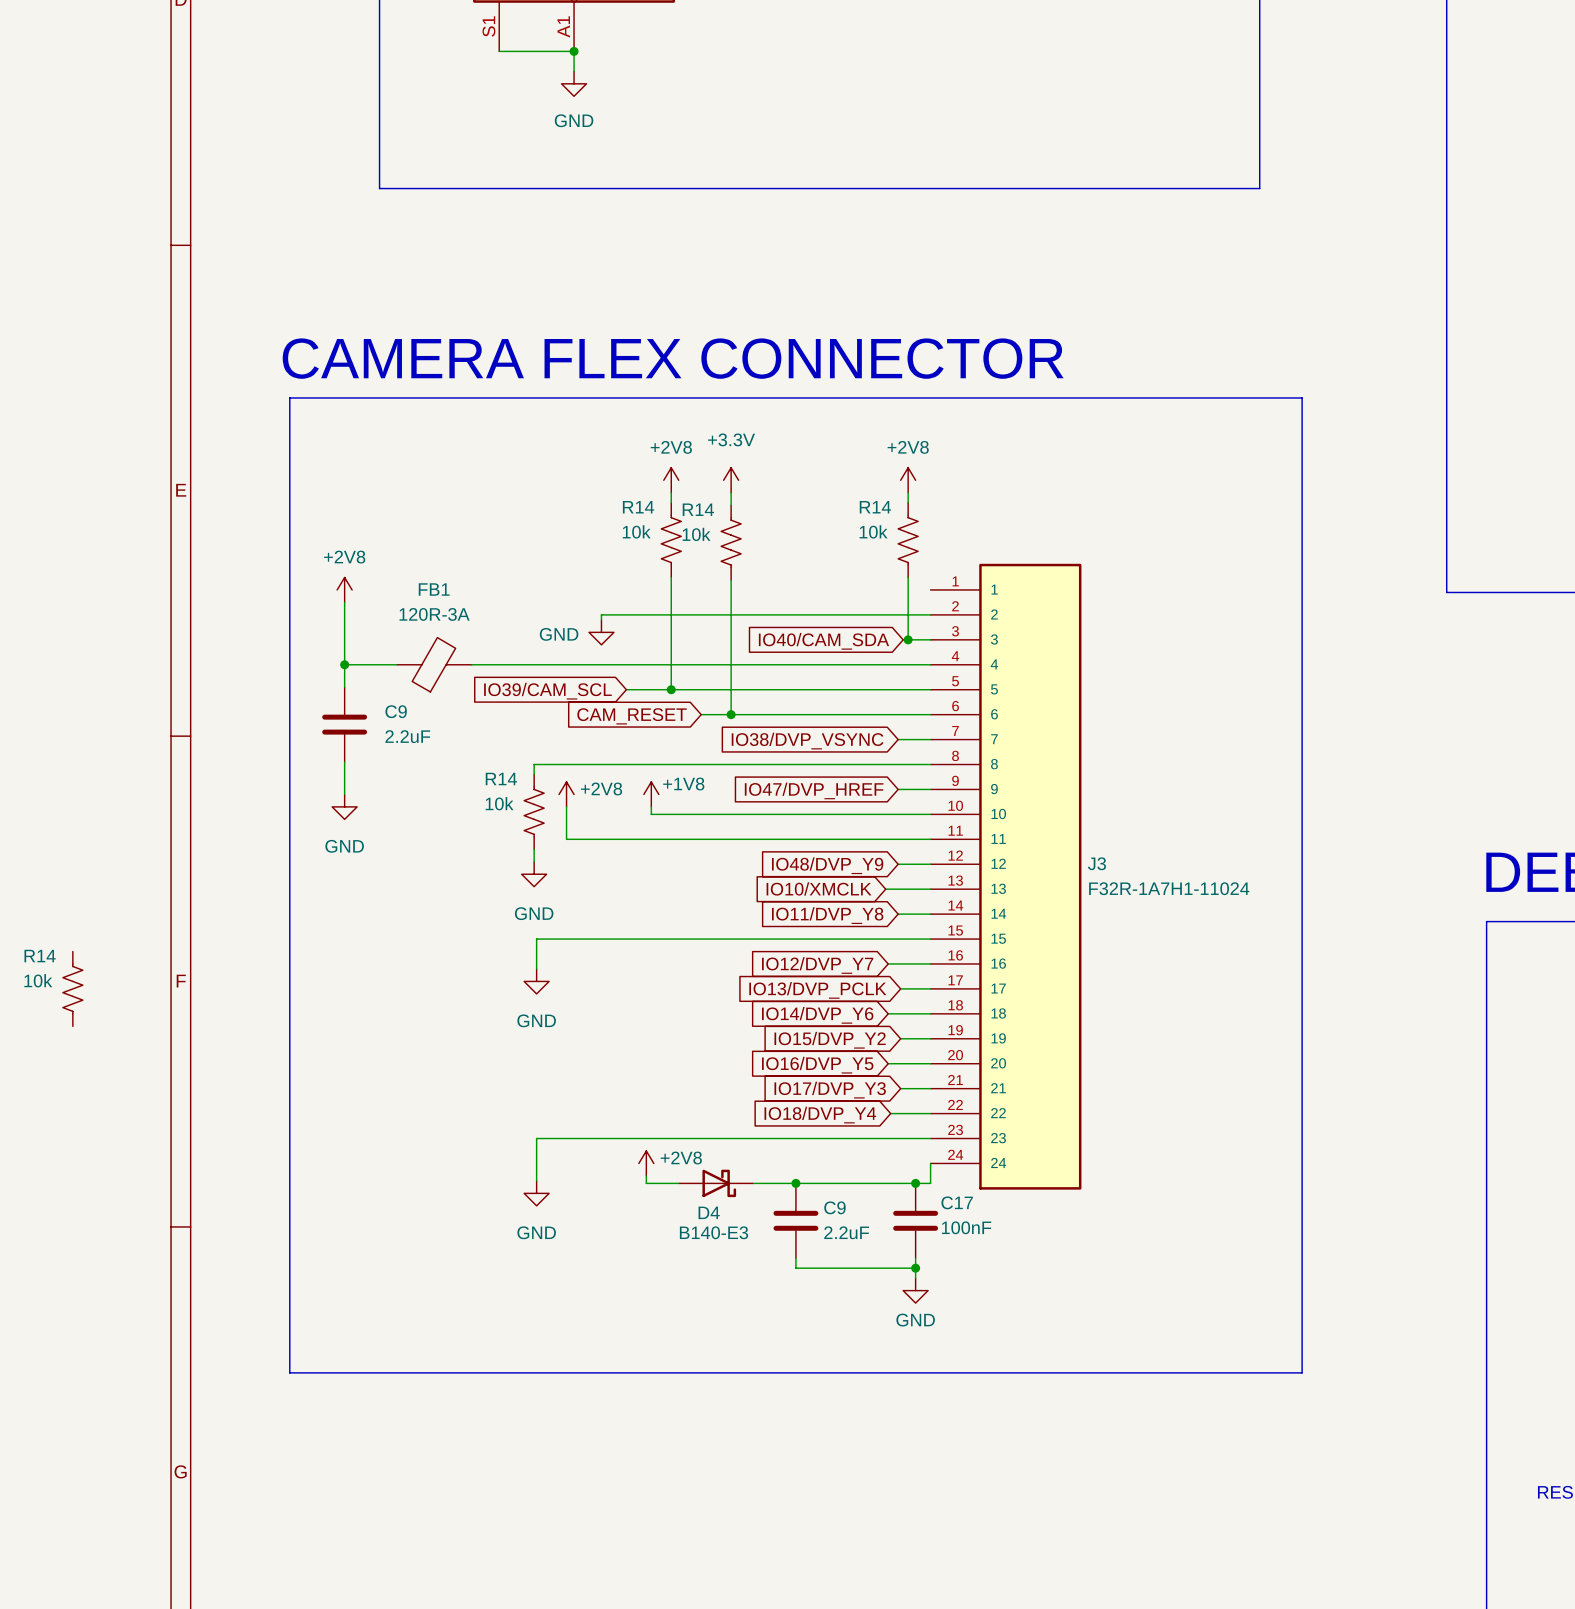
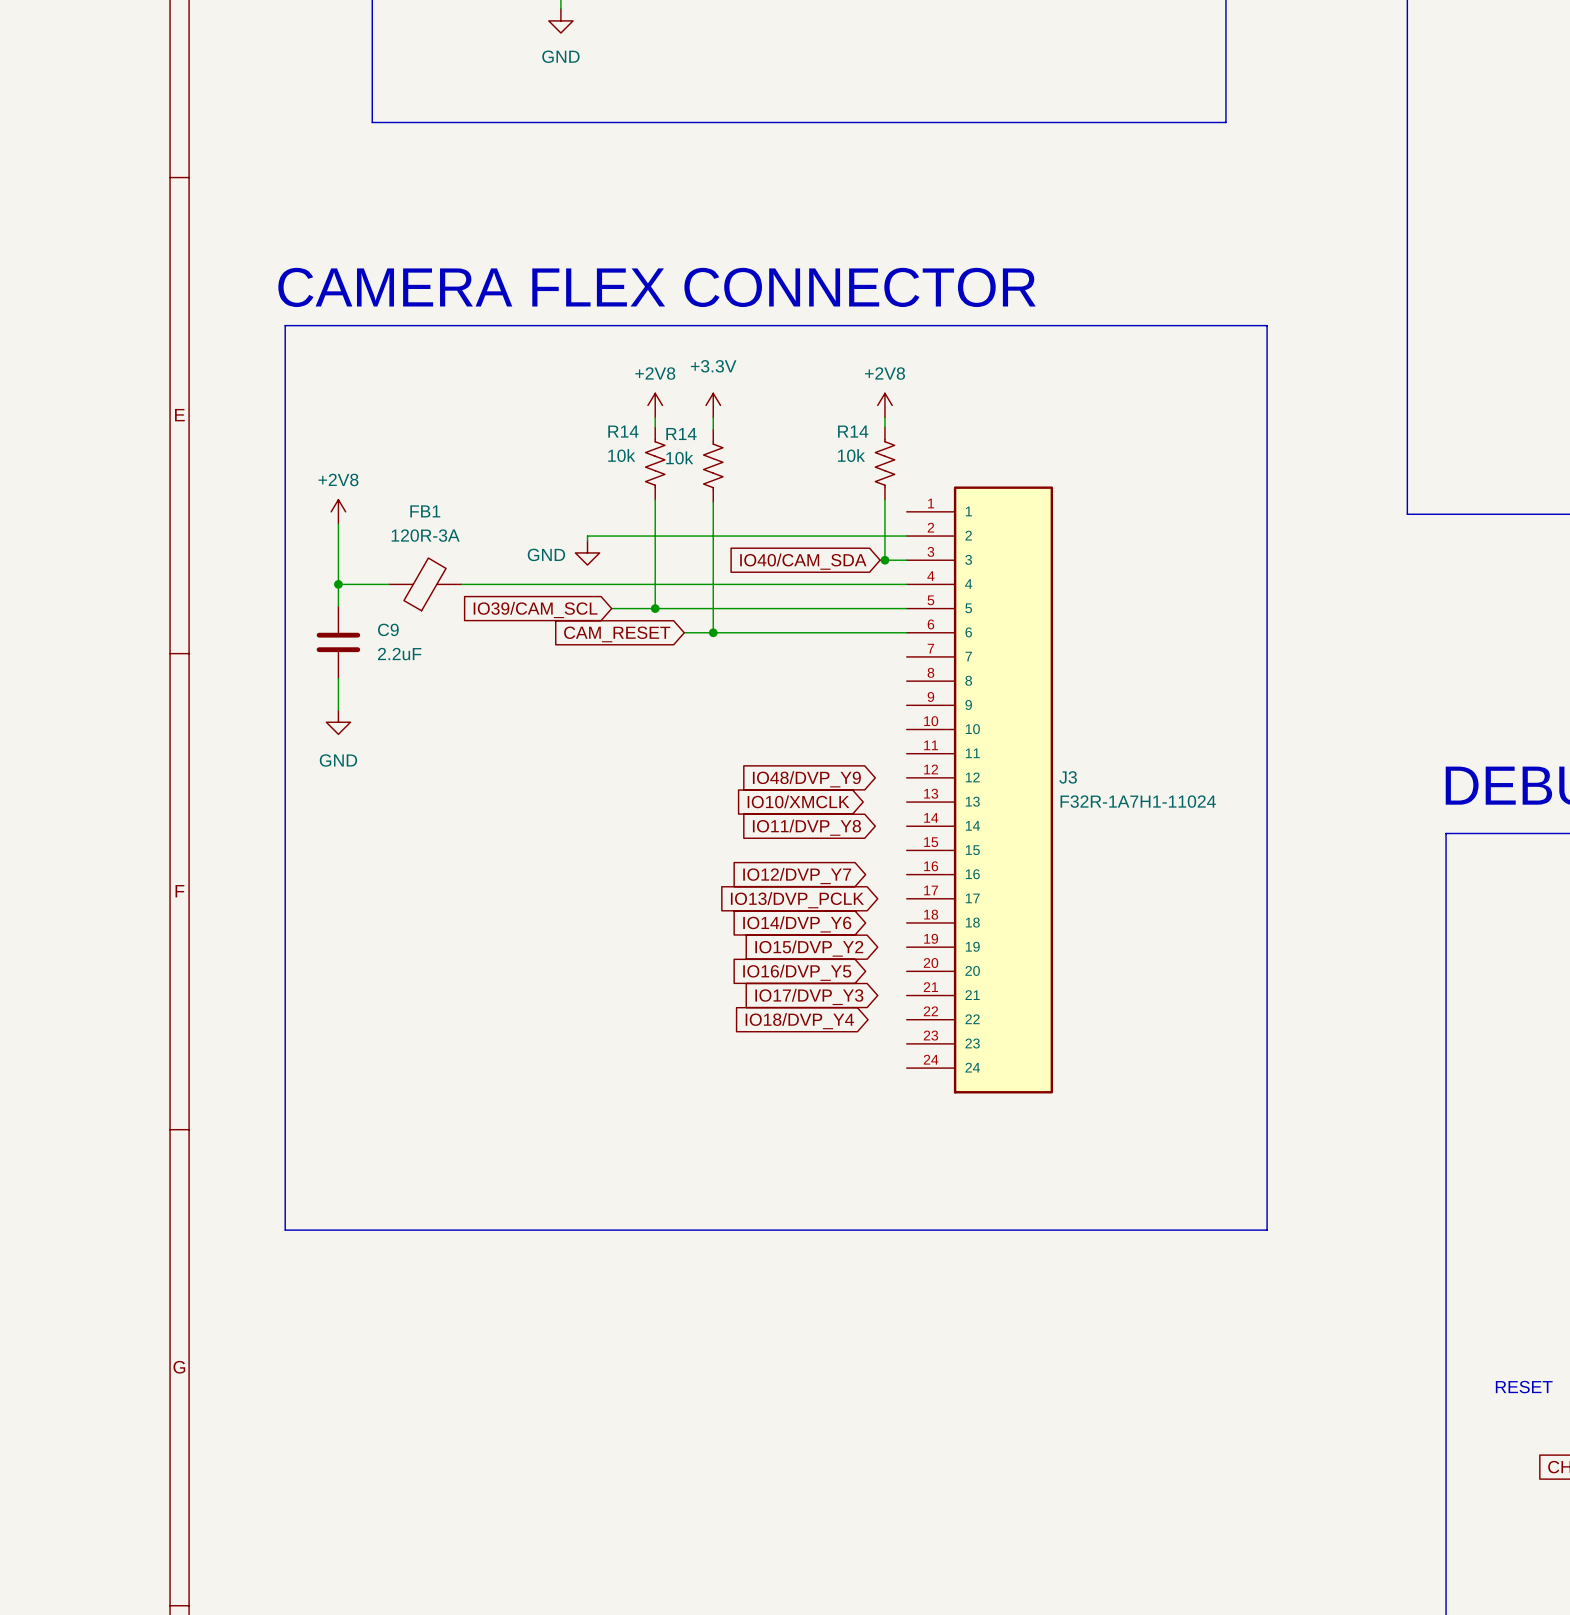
wire: (898, 739) (930, 739) -> none
global label: IO38/DVP_VSYNC (807, 741) -> none
wire: (930, 764) (534, 764) (534, 774) -> none
wire: (898, 789) (930, 789) -> none
global label: IO47/DVP_HREF (814, 790) -> none
power symbol: +2V8 (566, 794) -> none
power symbol: +1V8 (651, 794) -> none
wire: (566, 806) (566, 839) (930, 839) -> none
wire: (651, 806) (651, 814) (930, 814) -> none
R14: 10k (534, 811) -> none
wire: (534, 849) (534, 861) -> none
wire: (898, 864) (930, 864) -> none
power symbol: GND (534, 874) -> none
wire: (885, 889) (930, 889) -> none
wire: (898, 914) (930, 914) -> none
wire: (930, 939) (536, 939) (536, 968) -> none
wire: (888, 963) (930, 963) -> none
power symbol: GND (536, 981) -> none
R14: 10k (72, 988) -> none
wire: (900, 988) (930, 988) -> none
wire: (888, 1013) (930, 1013) -> none
wire: (900, 1038) (930, 1038) -> none
wire: (888, 1063) (930, 1063) -> none
wire: (900, 1088) (930, 1088) -> none
wire: (890, 1113) (930, 1113) -> none
wire: (930, 1138) (536, 1138) (536, 1180) -> none
power symbol: +2V8 (646, 1163) -> none
wire: (930, 1163) (930, 1183) (753, 1183) -> none
wire: (646, 1175) (646, 1183) (678, 1183) -> none
D4: B140-E3 (716, 1183) -> none
junction: (795, 1183) -> none
junction: (915, 1183) -> none
power symbol: GND (536, 1193) -> none
C9: 2.2uF (795, 1220) -> none
C17: 100nF (915, 1220) -> none
wire: (795, 1258) (795, 1268) (915, 1268) -> none
wire: (915, 1258) (915, 1278) -> none
junction: (915, 1268) -> none
power symbol: GND (915, 1290) -> none
line: (289, 1330) (289, 1372) (1302, 1372) (1302, 1330) -> (285, 1230) (1267, 1230)

